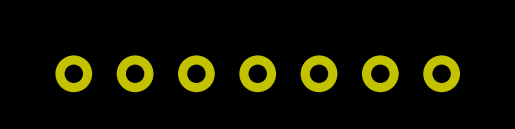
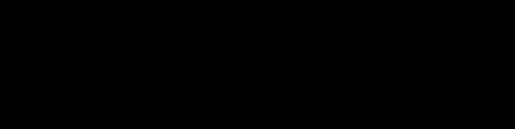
part: (257, 73) -> none

